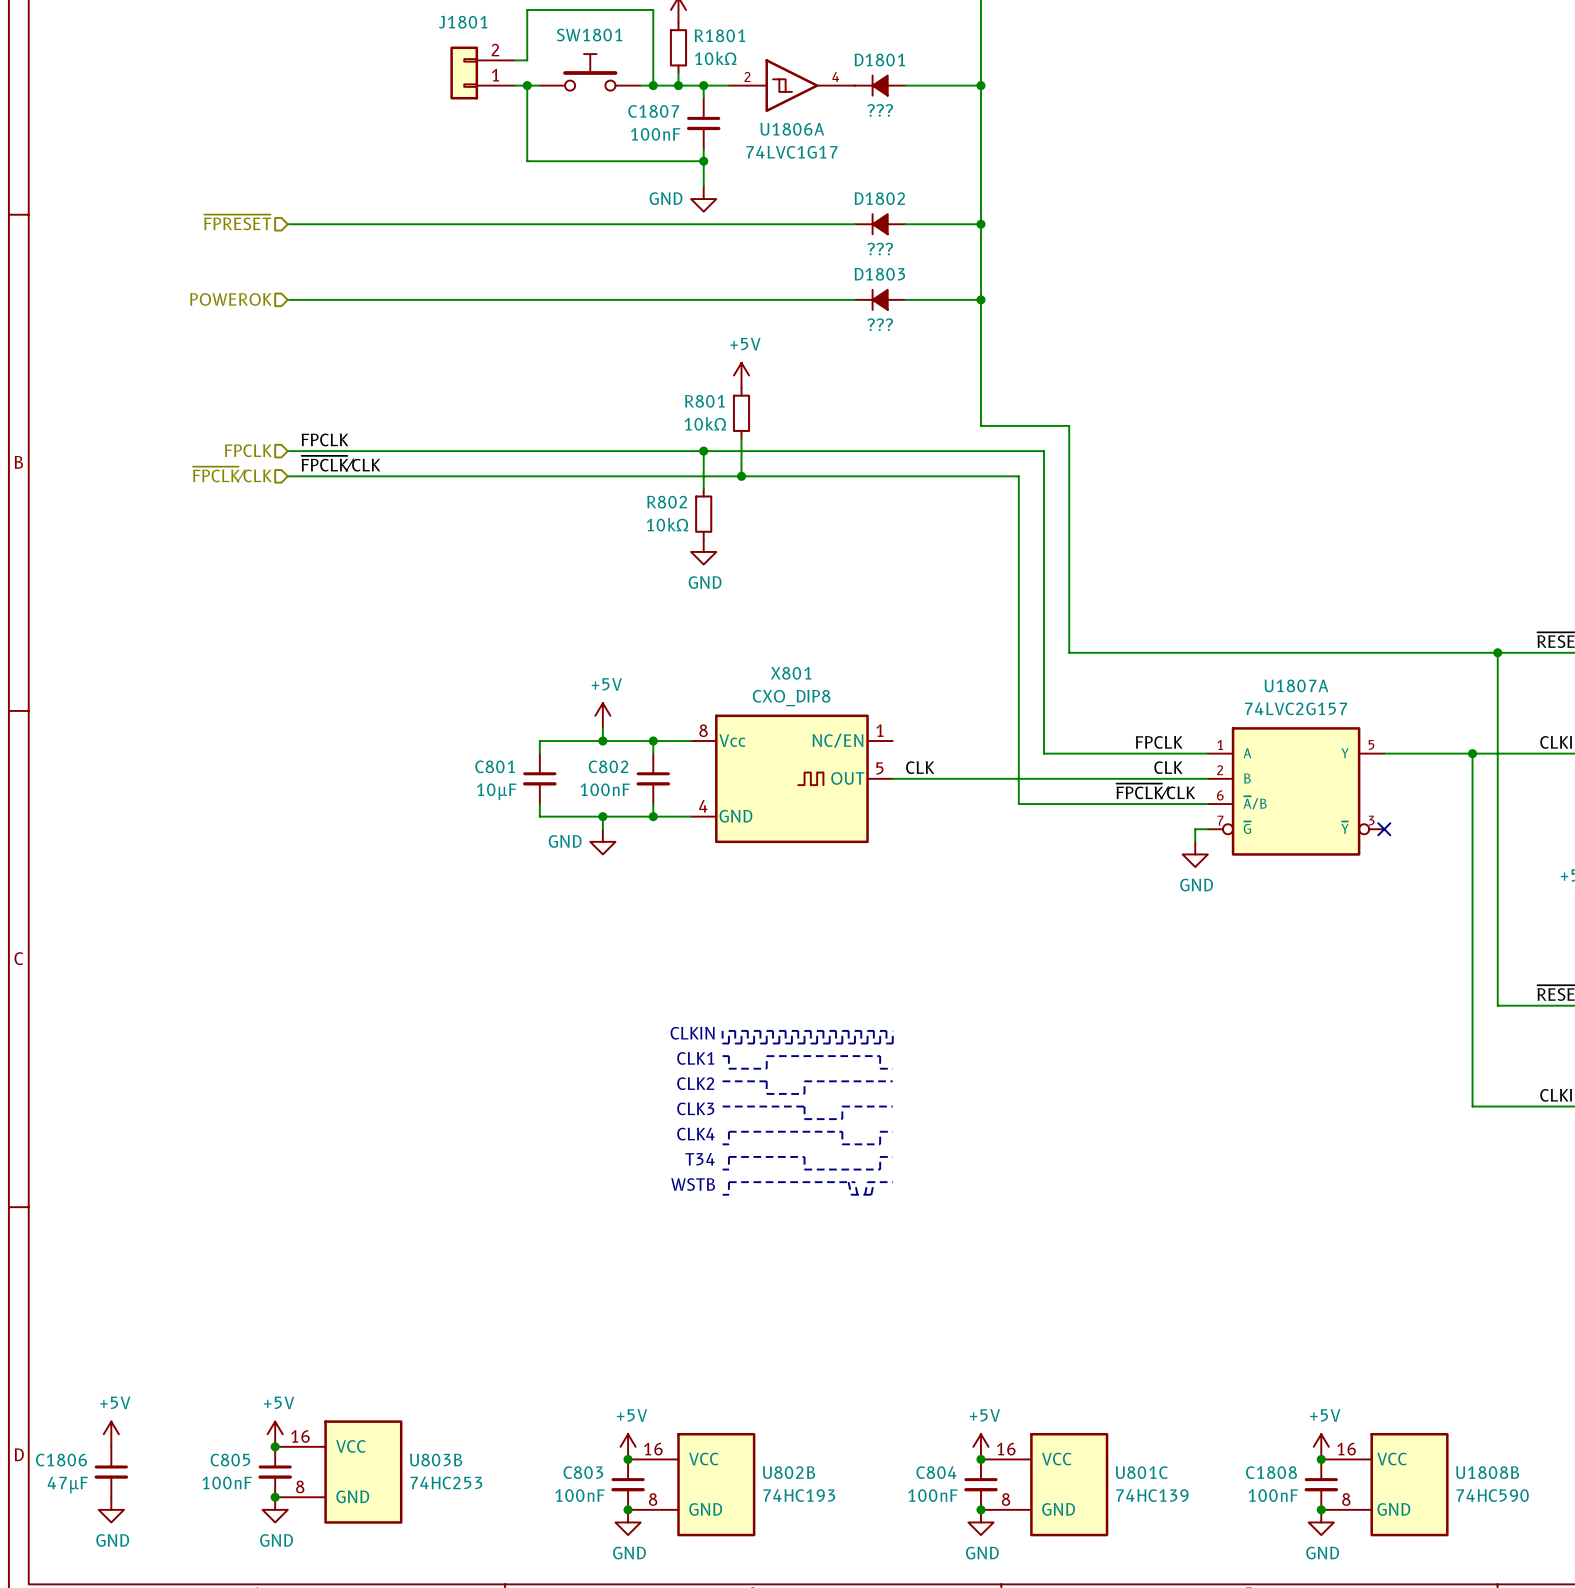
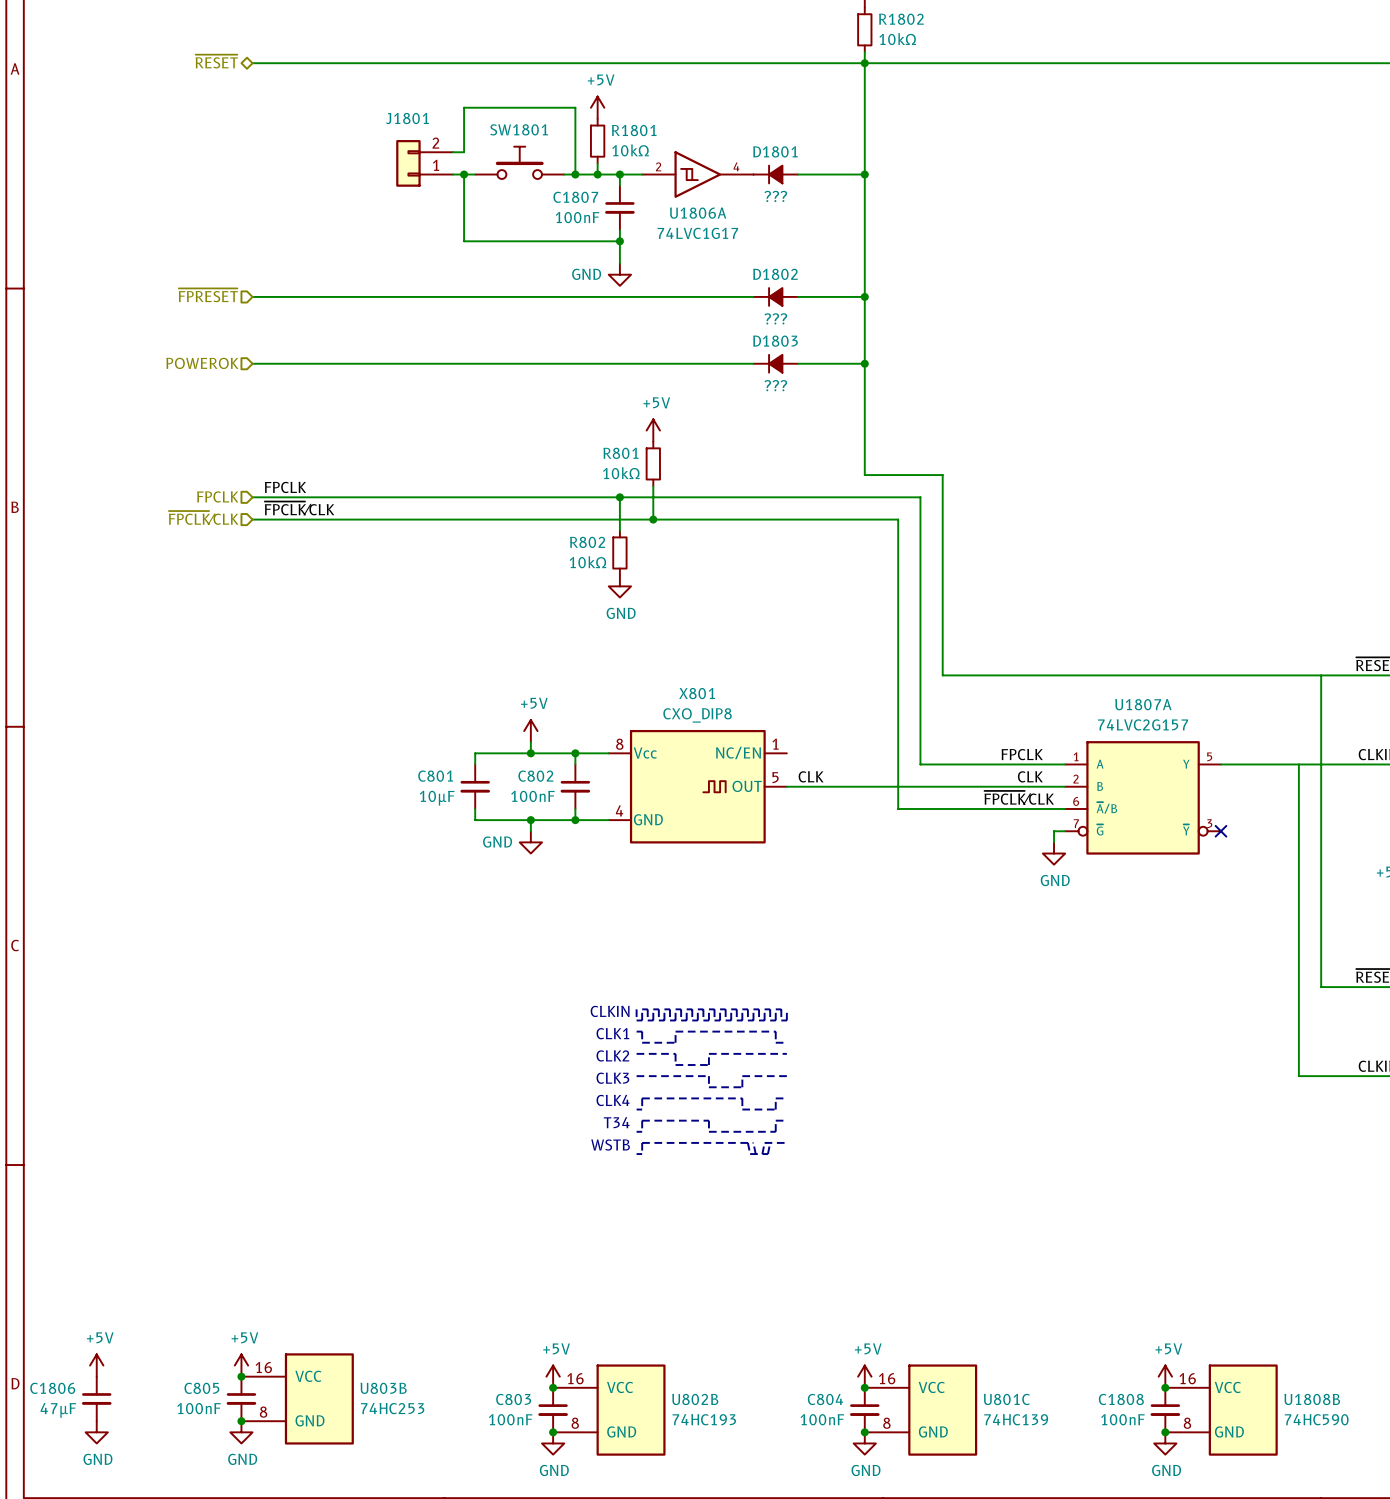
junction: (1497, 652) -> none
junction: (1472, 753) -> none

